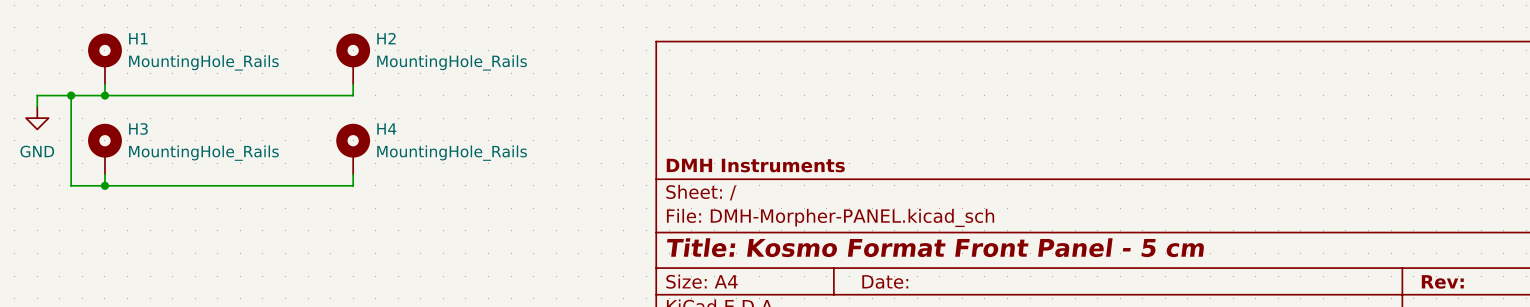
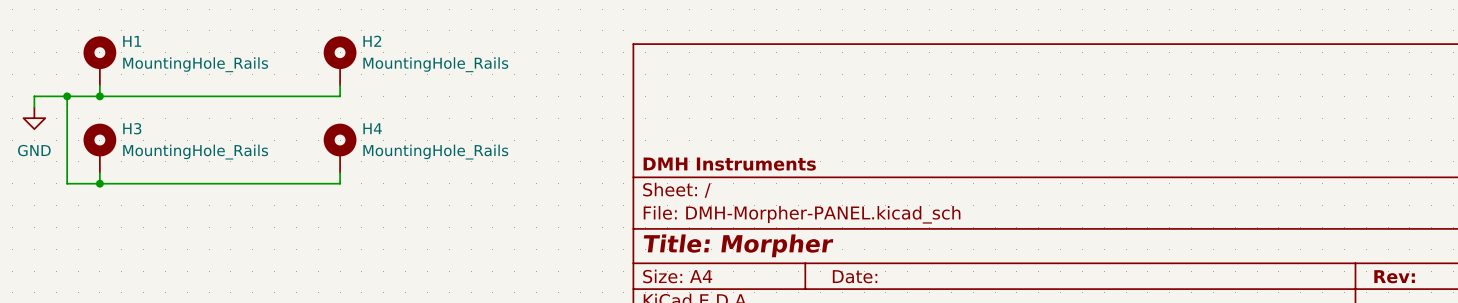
title block: Title: Kosmo Format Front Panel - 5 cm (935, 247) -> Title: Morpher (738, 245)

